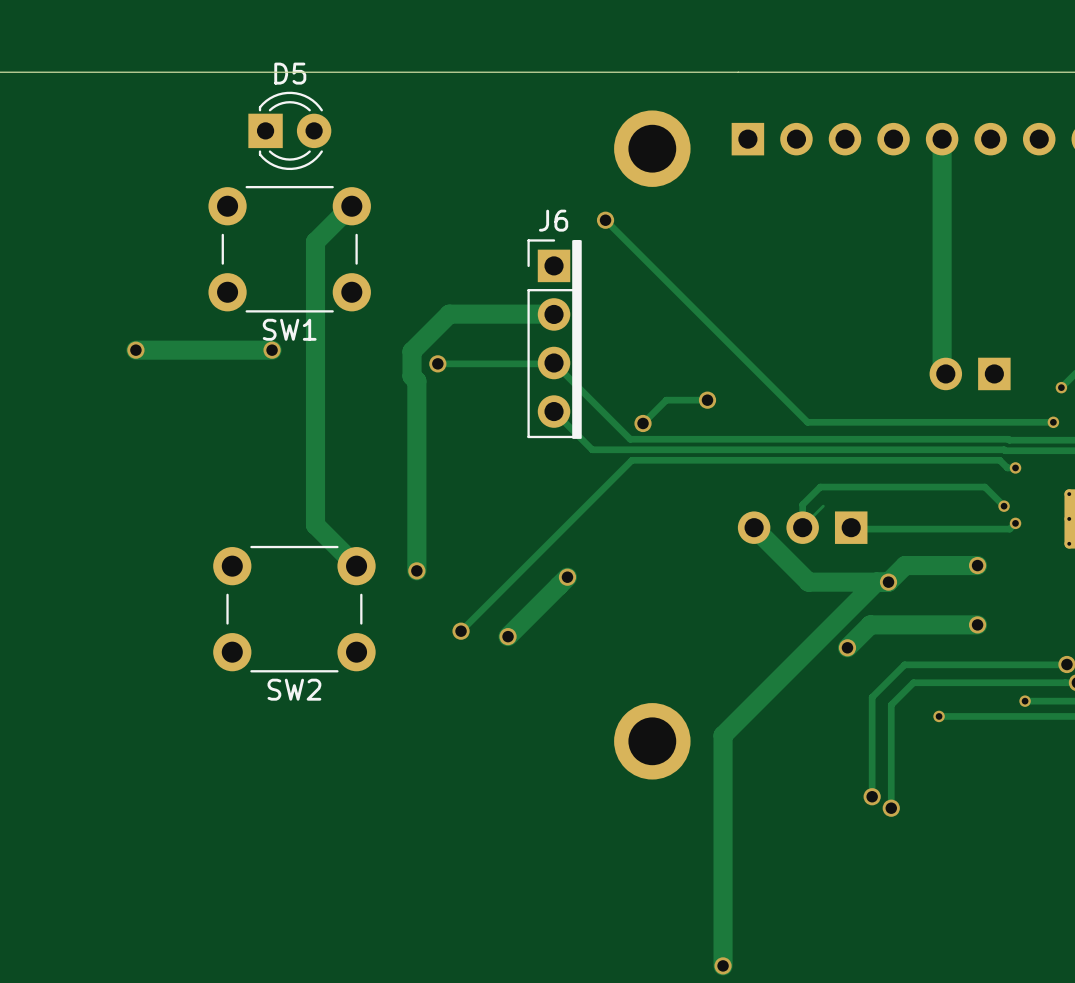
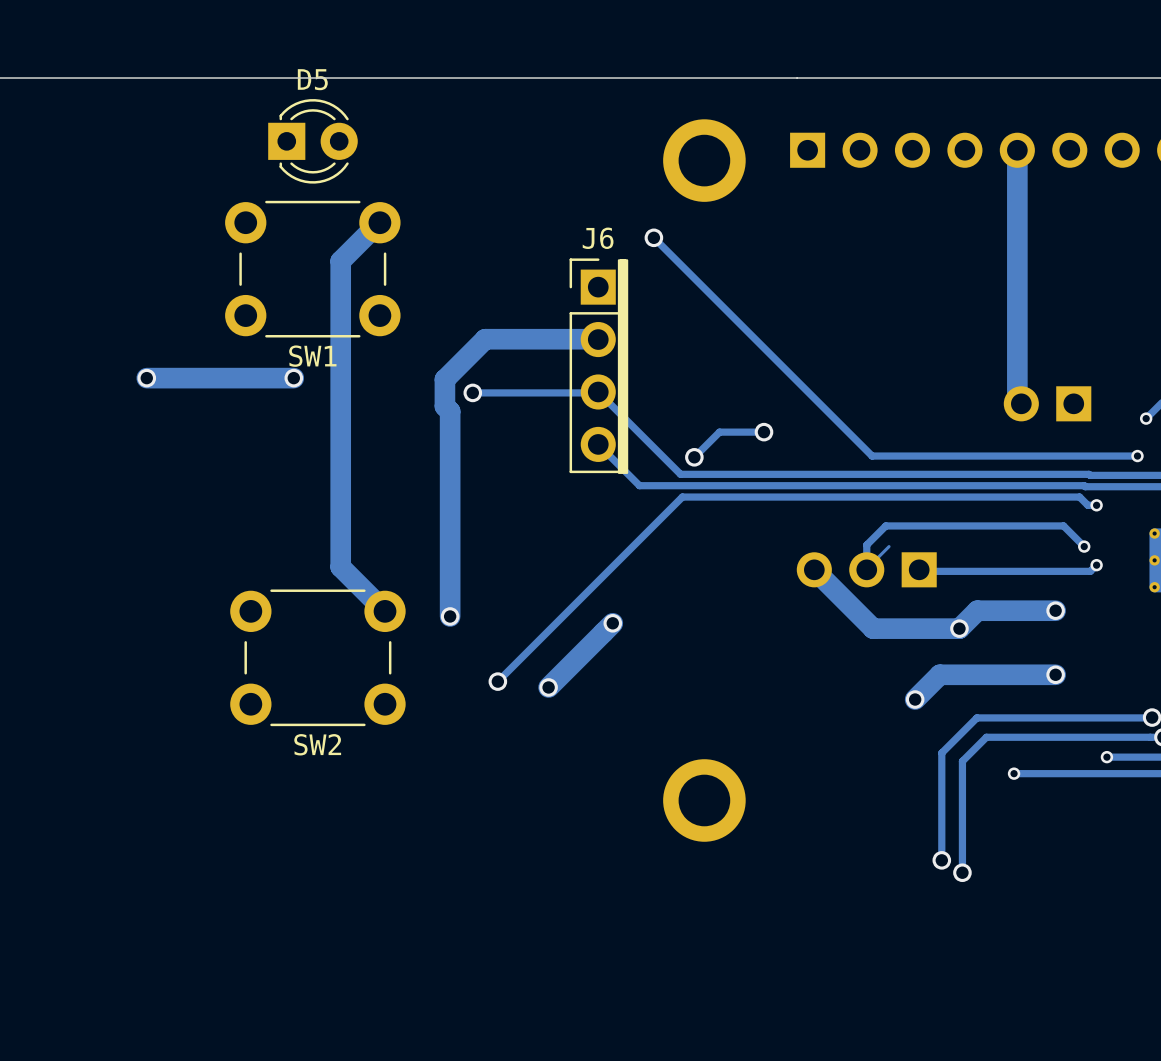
track: (876, 582) (723, 735) (723, 965) -> none
via: (723, 965) -> none

